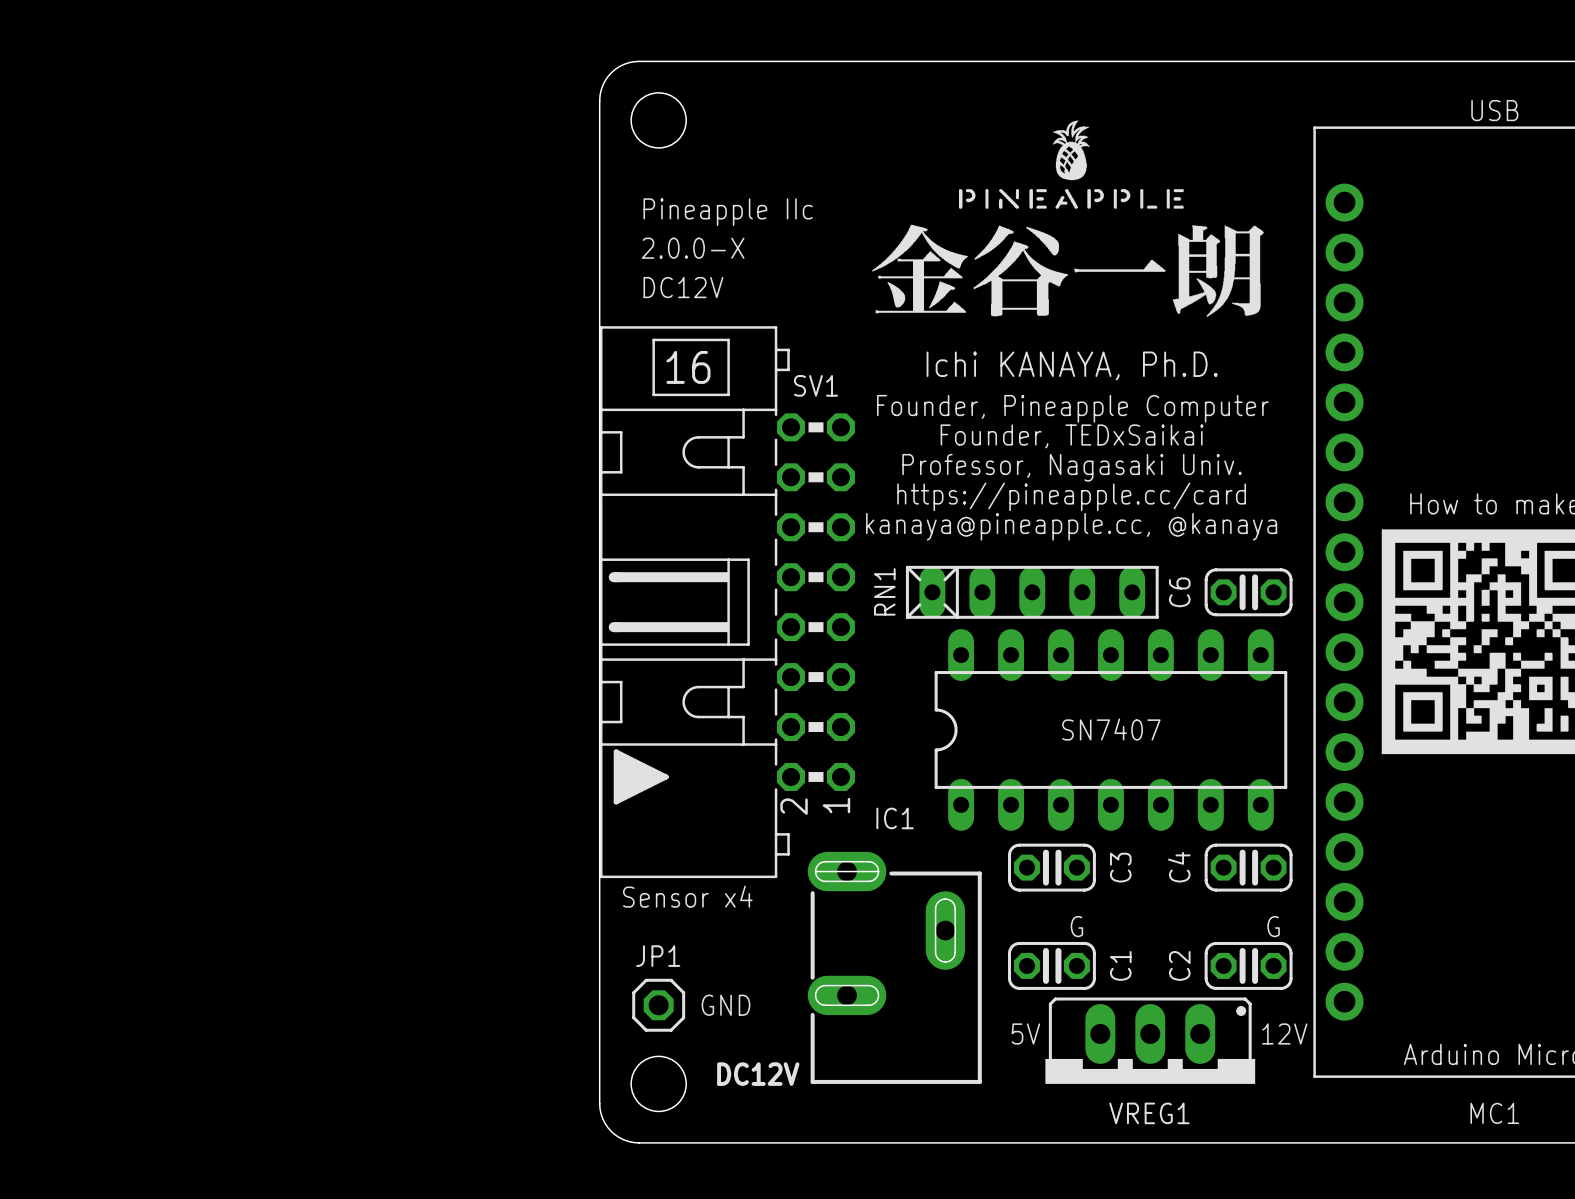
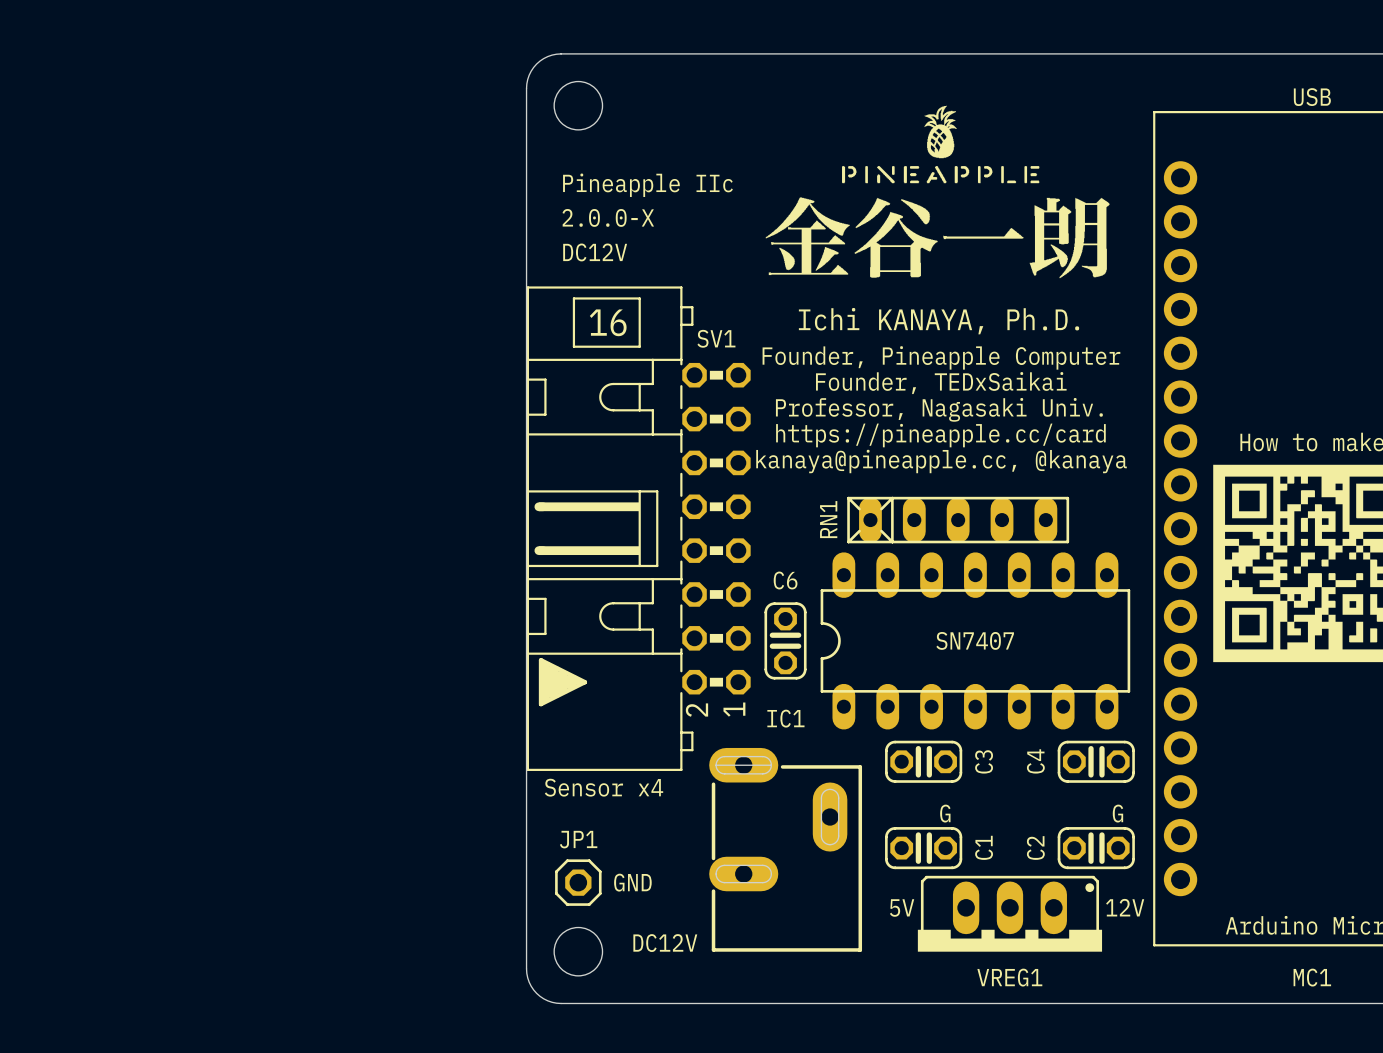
RN1 position: (1032, 592) -> (958, 520)
C6 name position: C6 (1179, 592) -> C6 (785, 580)
C6 rotation: 0° (1248, 592) -> 90° counterclockwise (785, 640)
C6 position: (1248, 592) -> (785, 640)

